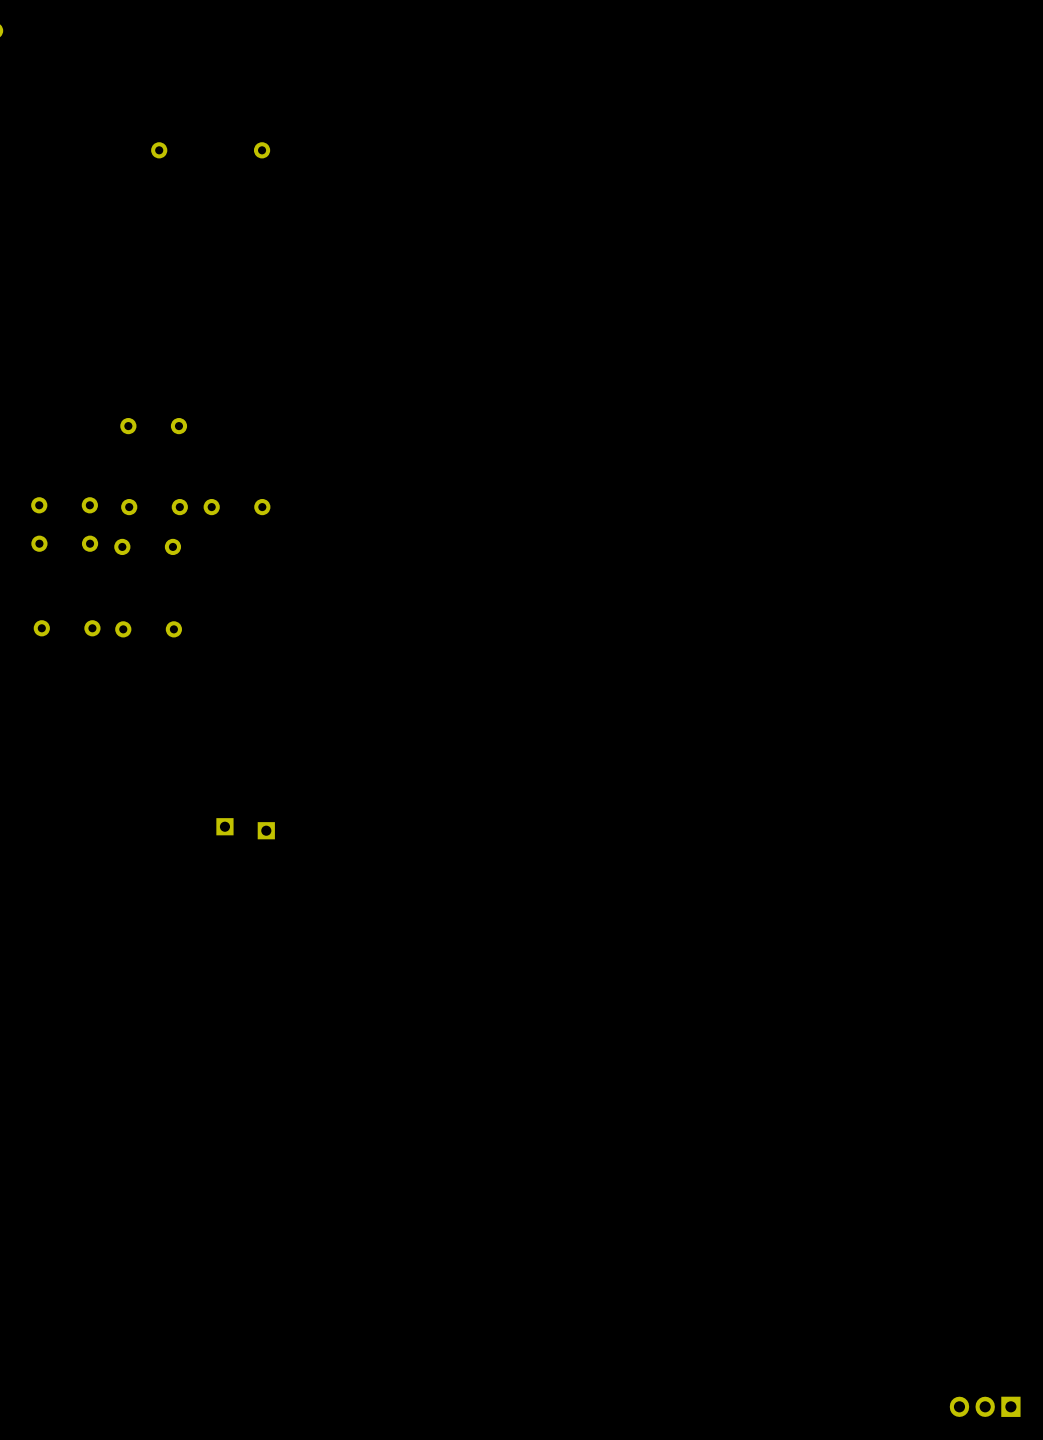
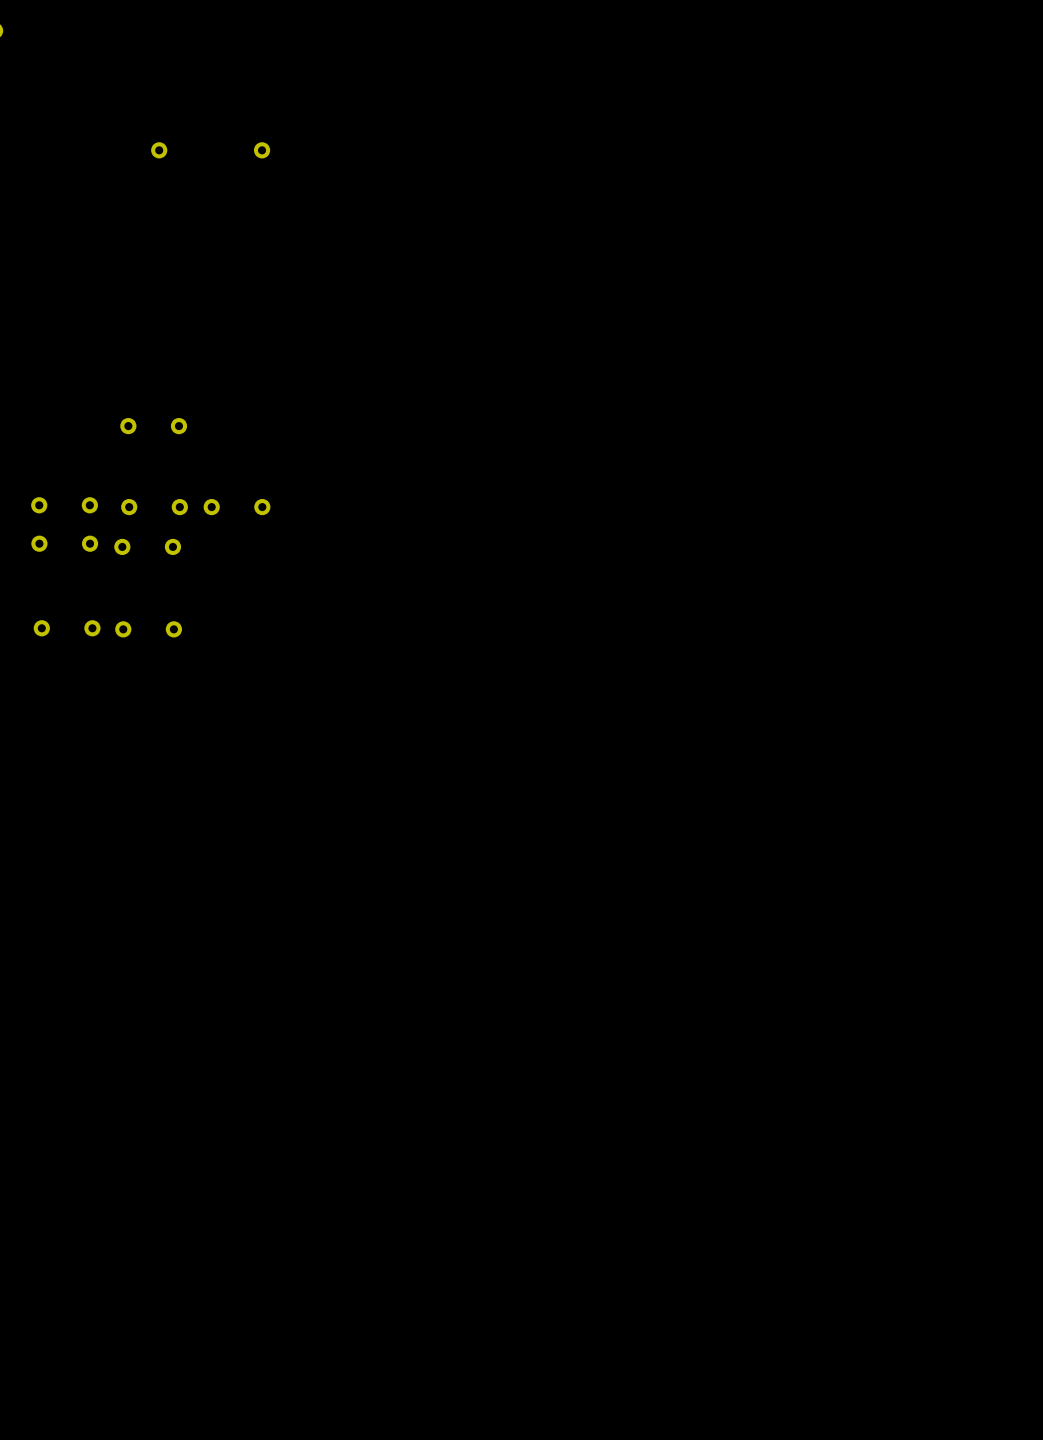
part: (224, 826) -> none
part: (266, 830) -> none
part: (985, 1406) -> none

